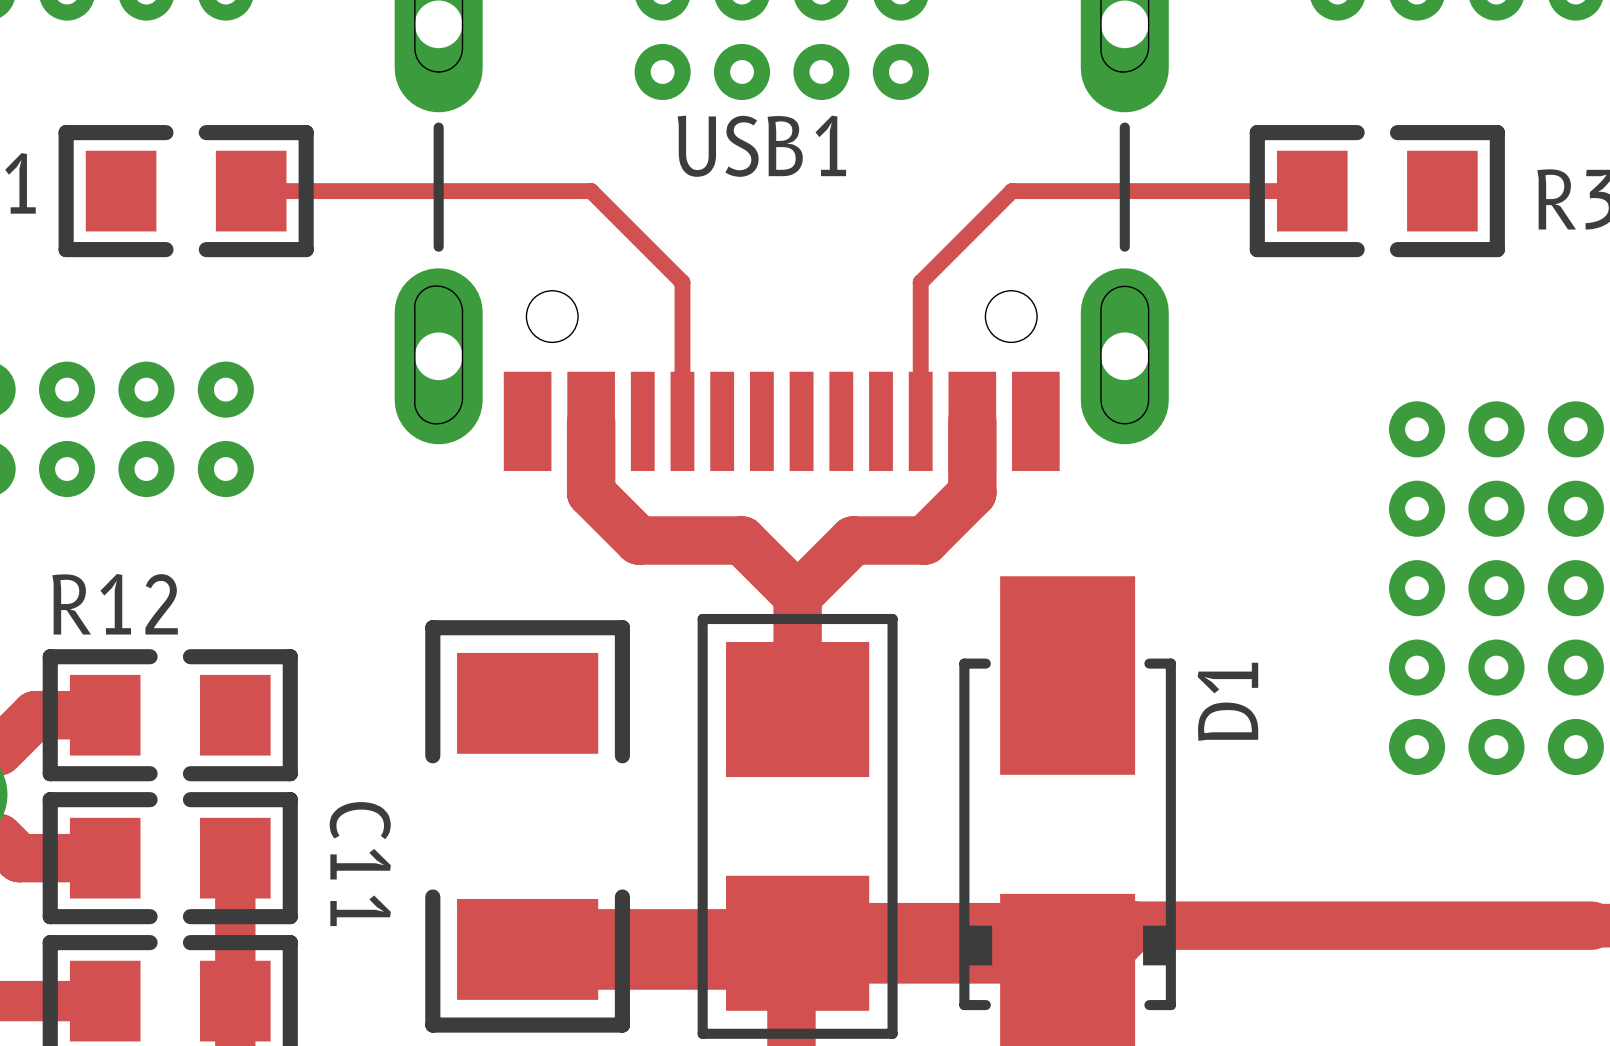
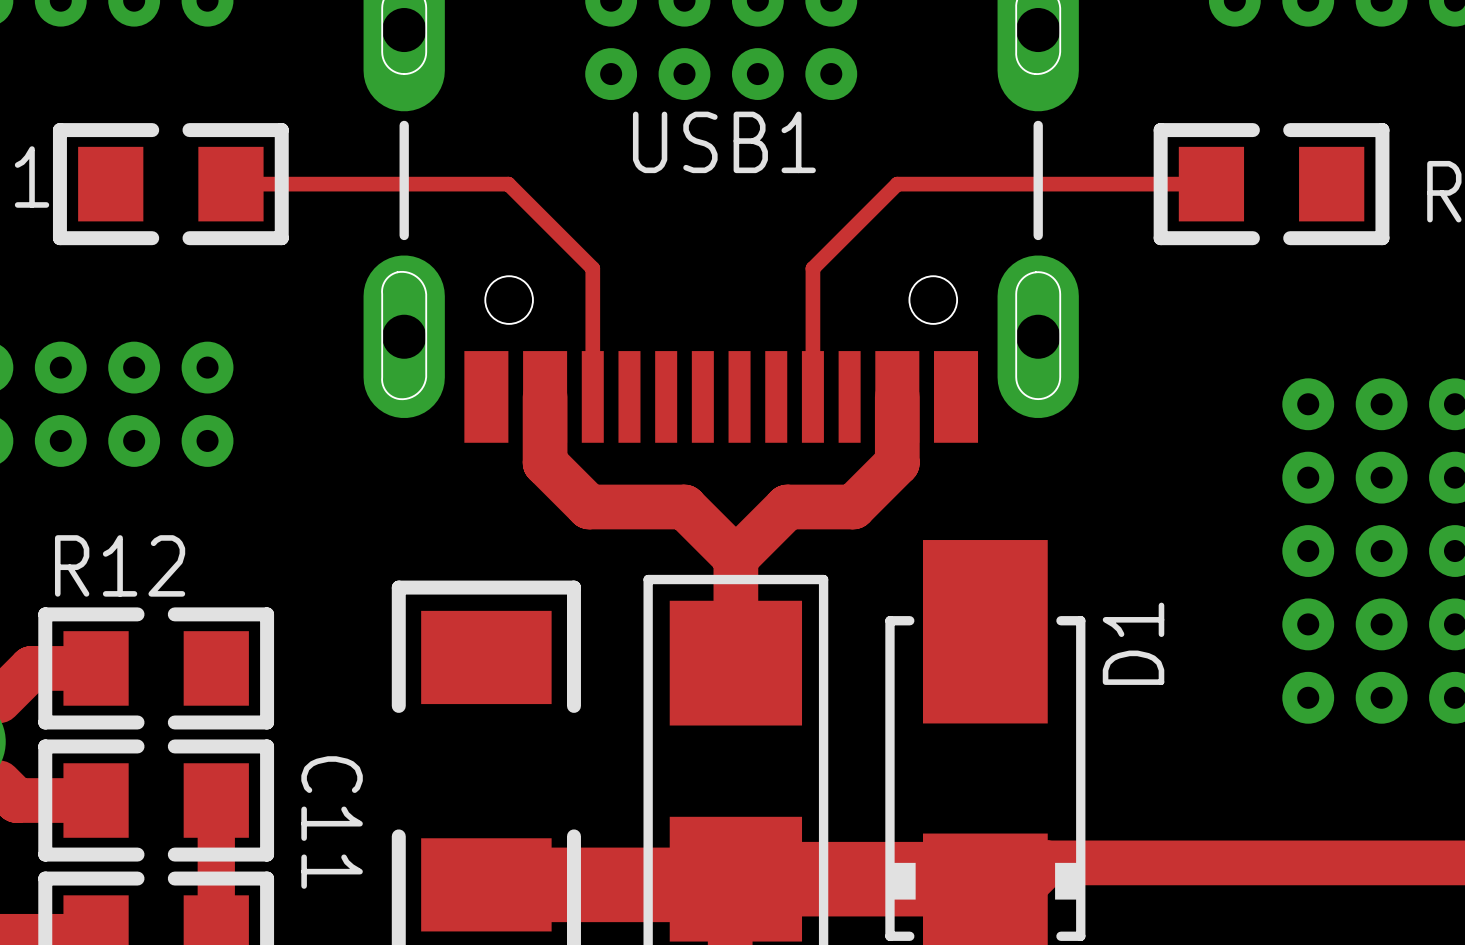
track: (551, 191) (591, 191) (682, 282) (682, 421) -> (508, 184) (592, 268) (592, 396)
track: (1012, 191) (920, 282) (920, 421) -> (934, 184) (897, 184) (812, 268) (812, 396)

